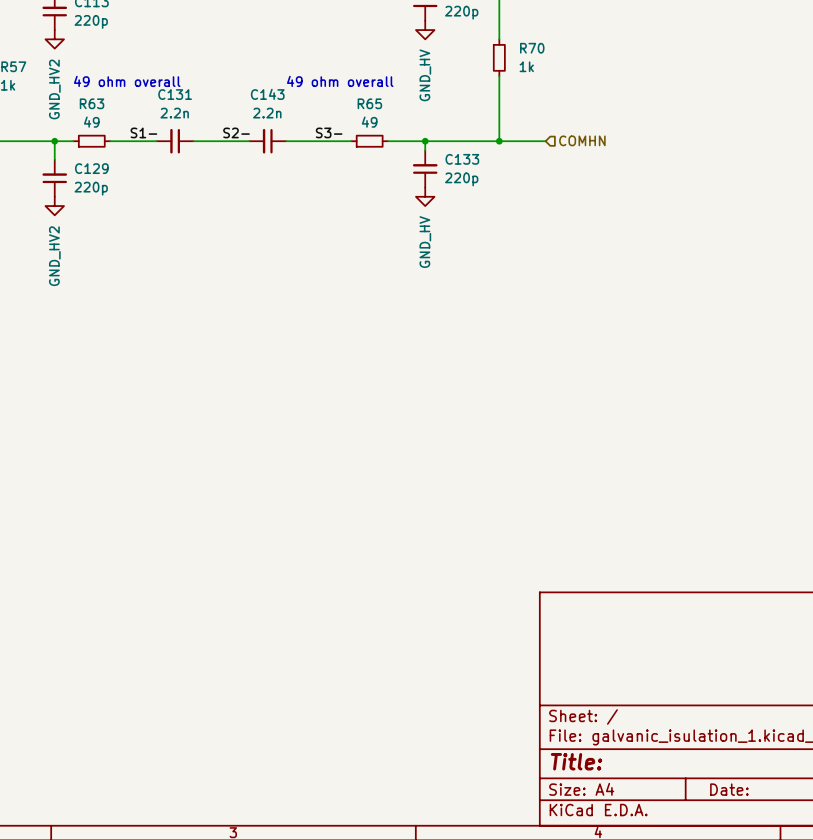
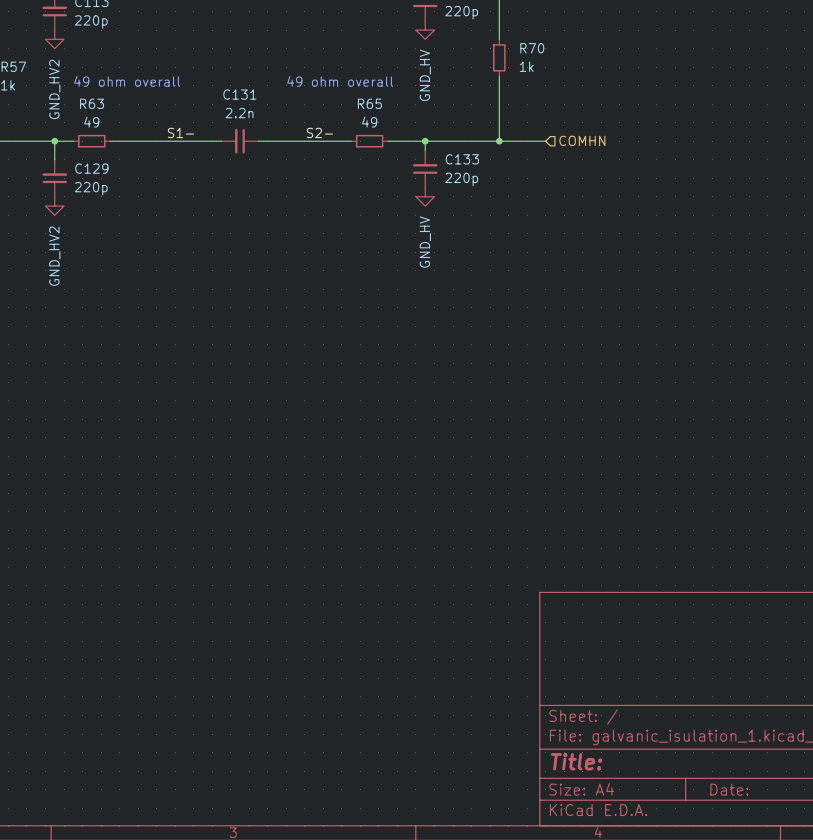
label position: S1- (143, 132) -> S1- (180, 132)
label position: S2- (236, 132) -> S2- (319, 132)
label: S3- (329, 132) -> none
C131 position: (175, 141) -> (239, 141)
C143: 2.2n (267, 141) -> none

